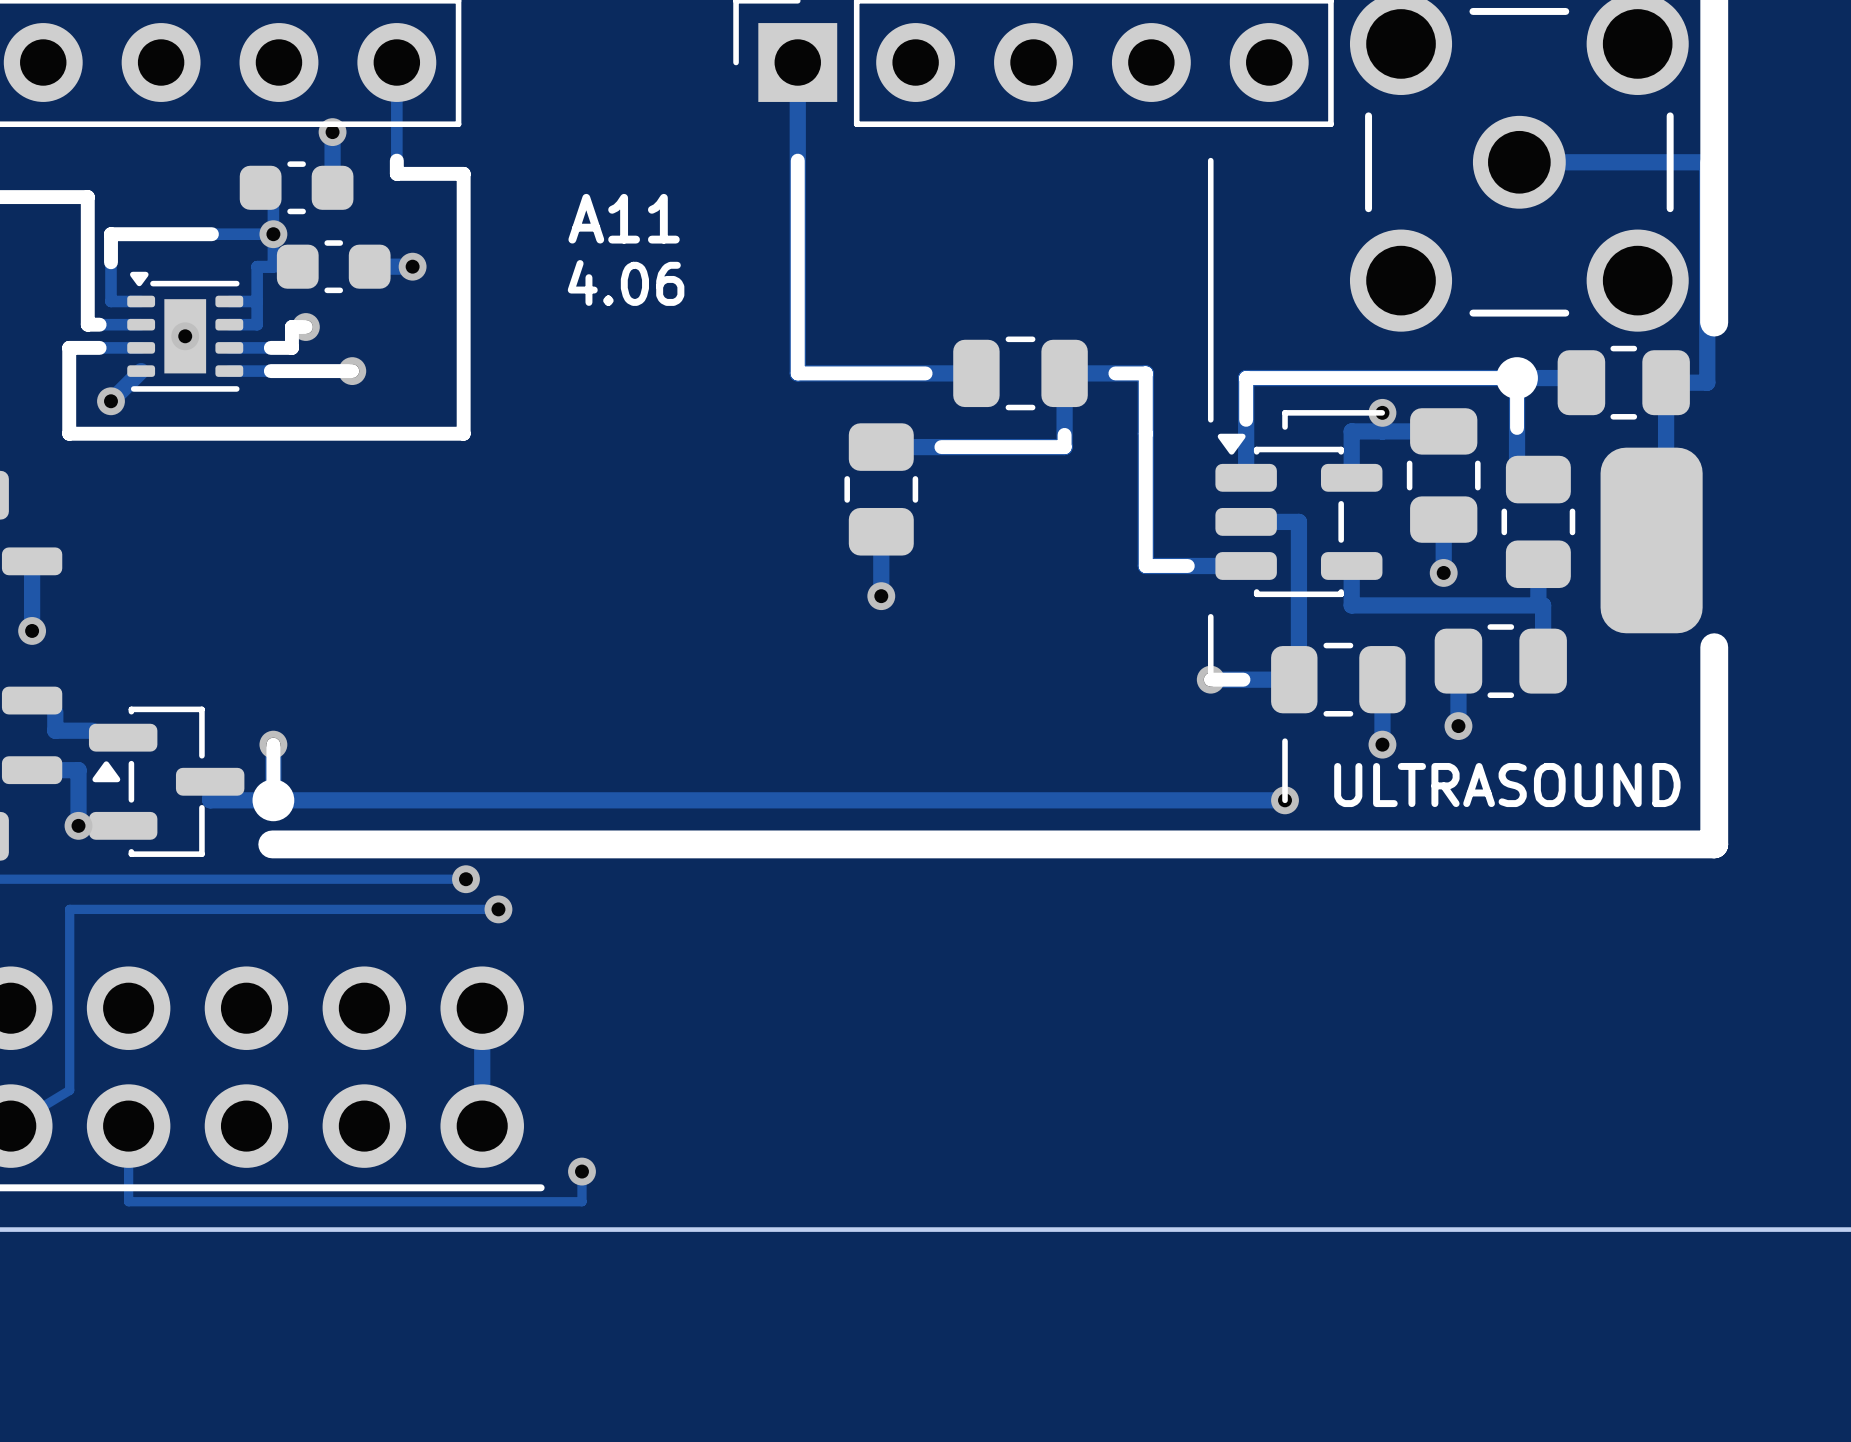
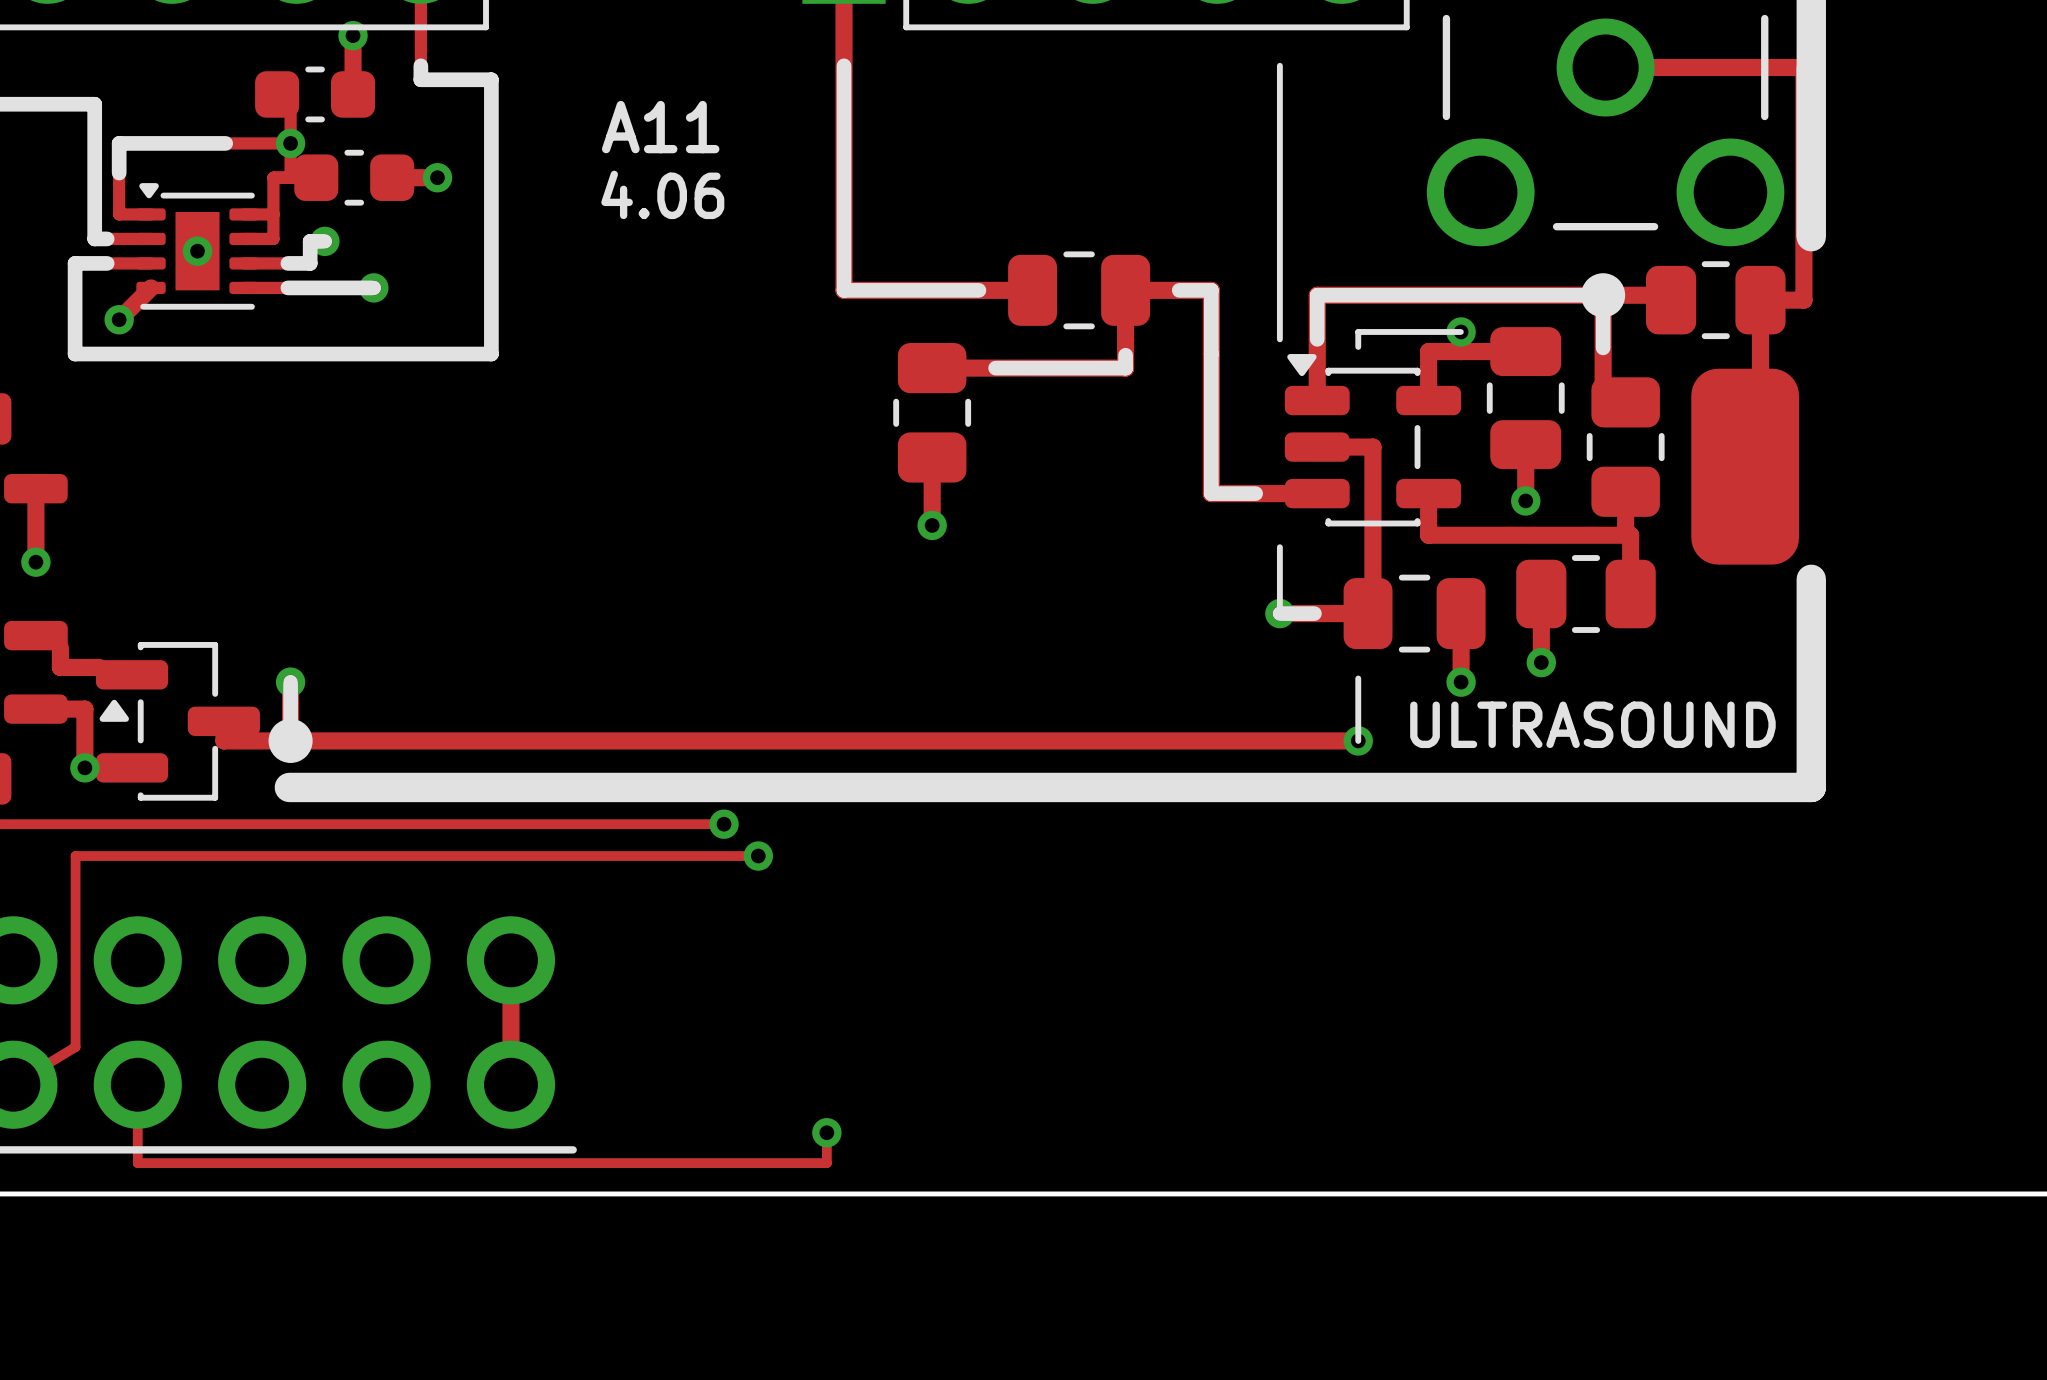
track: none -> (493, 824) (724, 824)
via: (465, 879) -> none
via: none -> (724, 824)
track: none -> (528, 856) (758, 856)
via: (498, 909) -> none
via: none -> (758, 856)
track: (581, 1171) (581, 1201) (128, 1200) -> (826, 1132) (826, 1163) (137, 1163)
via: (581, 1171) -> none
via: none -> (826, 1132)

